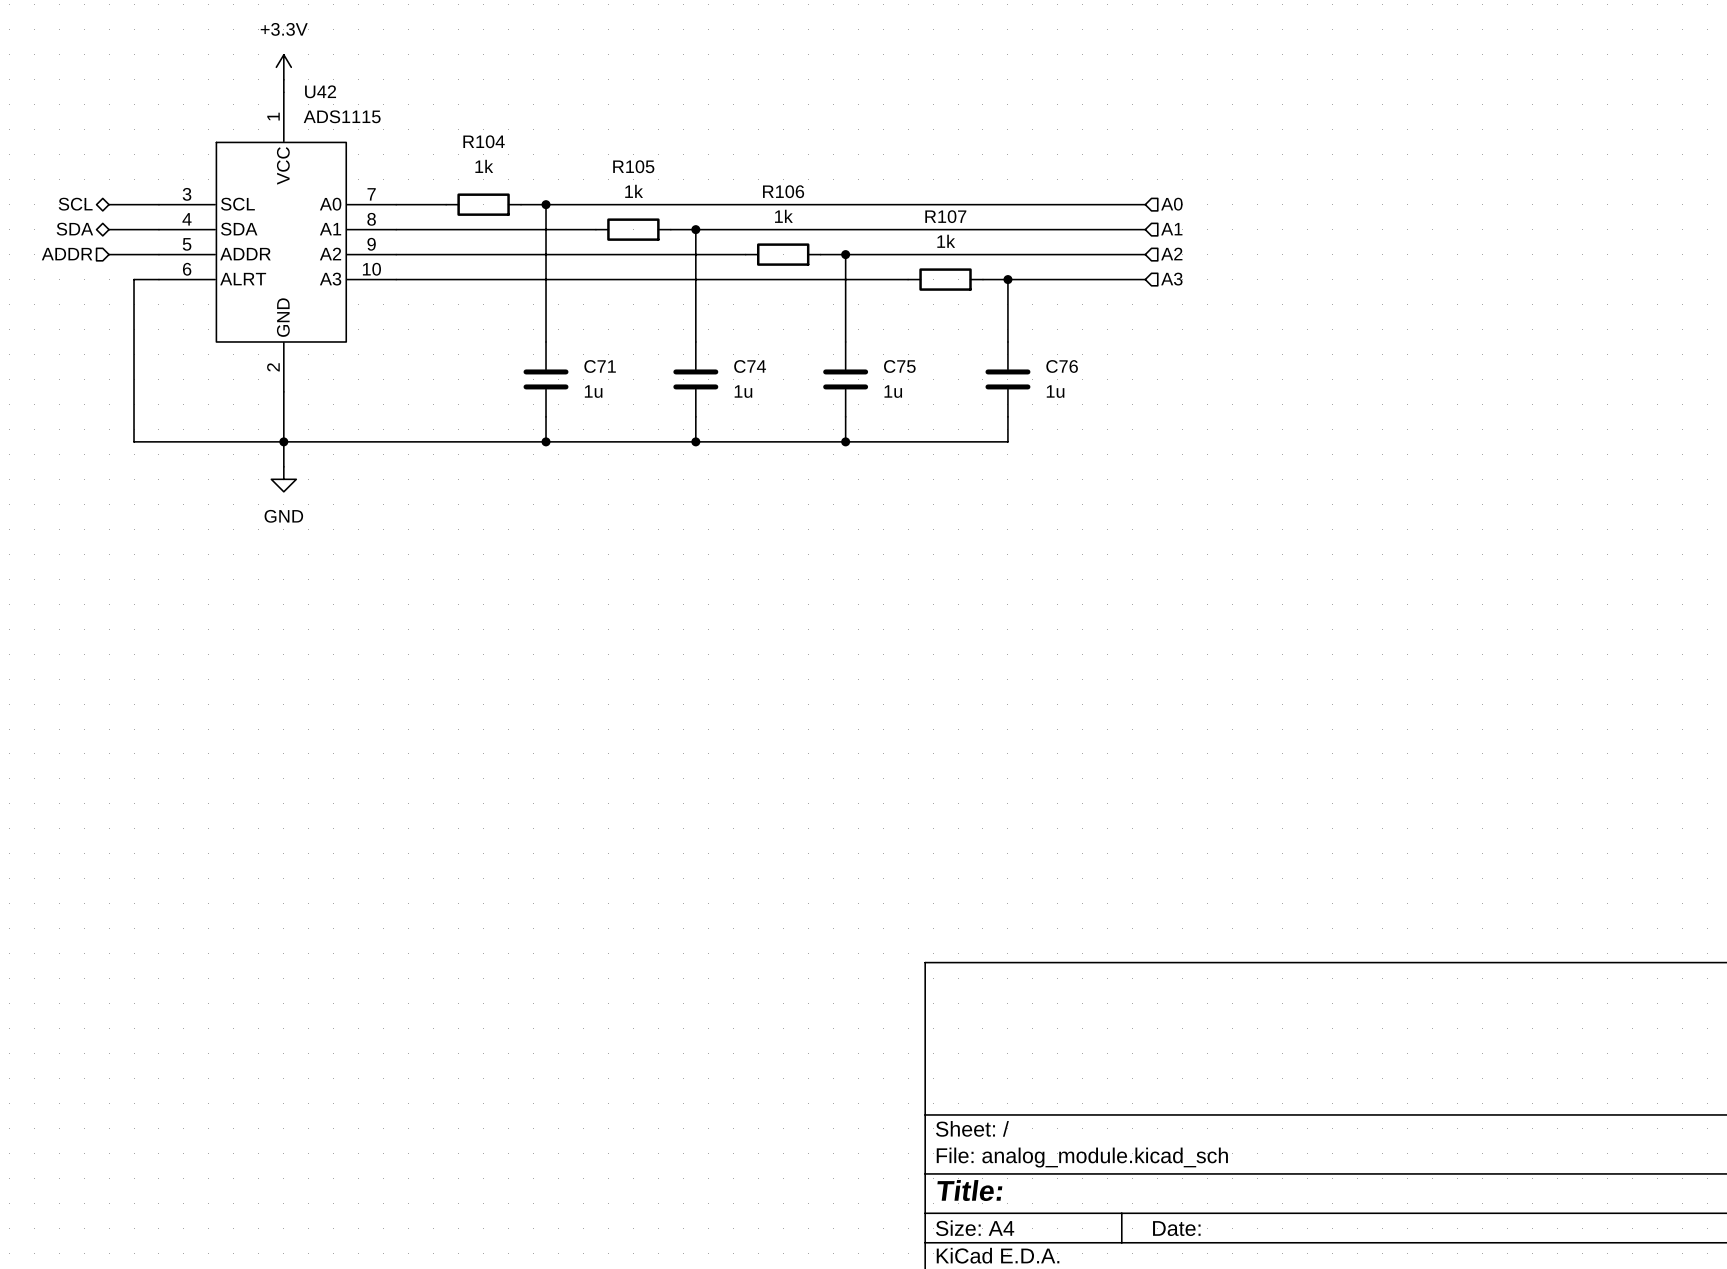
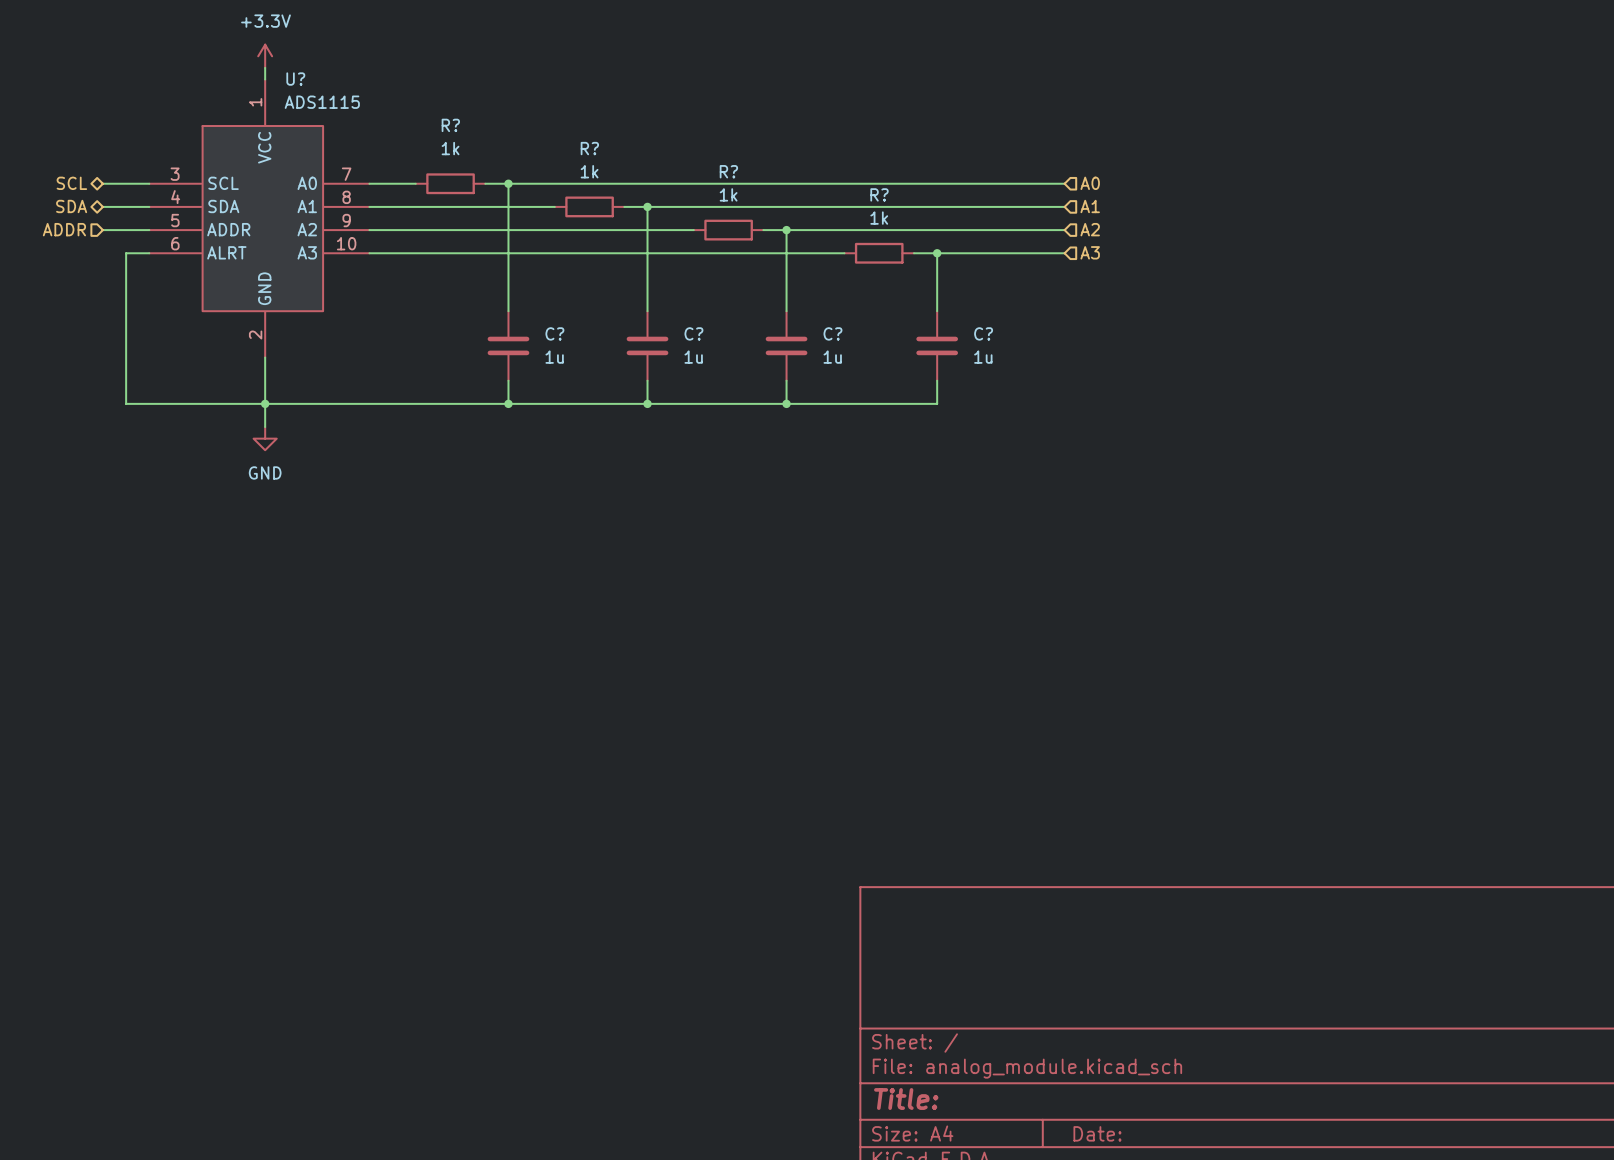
U42 name: U42 (320, 91) -> U? (295, 79)
R104 name: R104 (484, 141) -> R? (450, 125)
R105 name: R105 (633, 166) -> R? (589, 148)
R106 name: R106 (783, 191) -> R? (728, 171)
R107 name: R107 (945, 216) -> R? (879, 194)
C71 name: C71 (600, 366) -> C? (554, 333)
C74 name: C74 (750, 366) -> C? (693, 333)
C75 name: C75 (899, 366) -> C? (832, 333)
C76 name: C76 (1062, 366) -> C? (983, 333)

